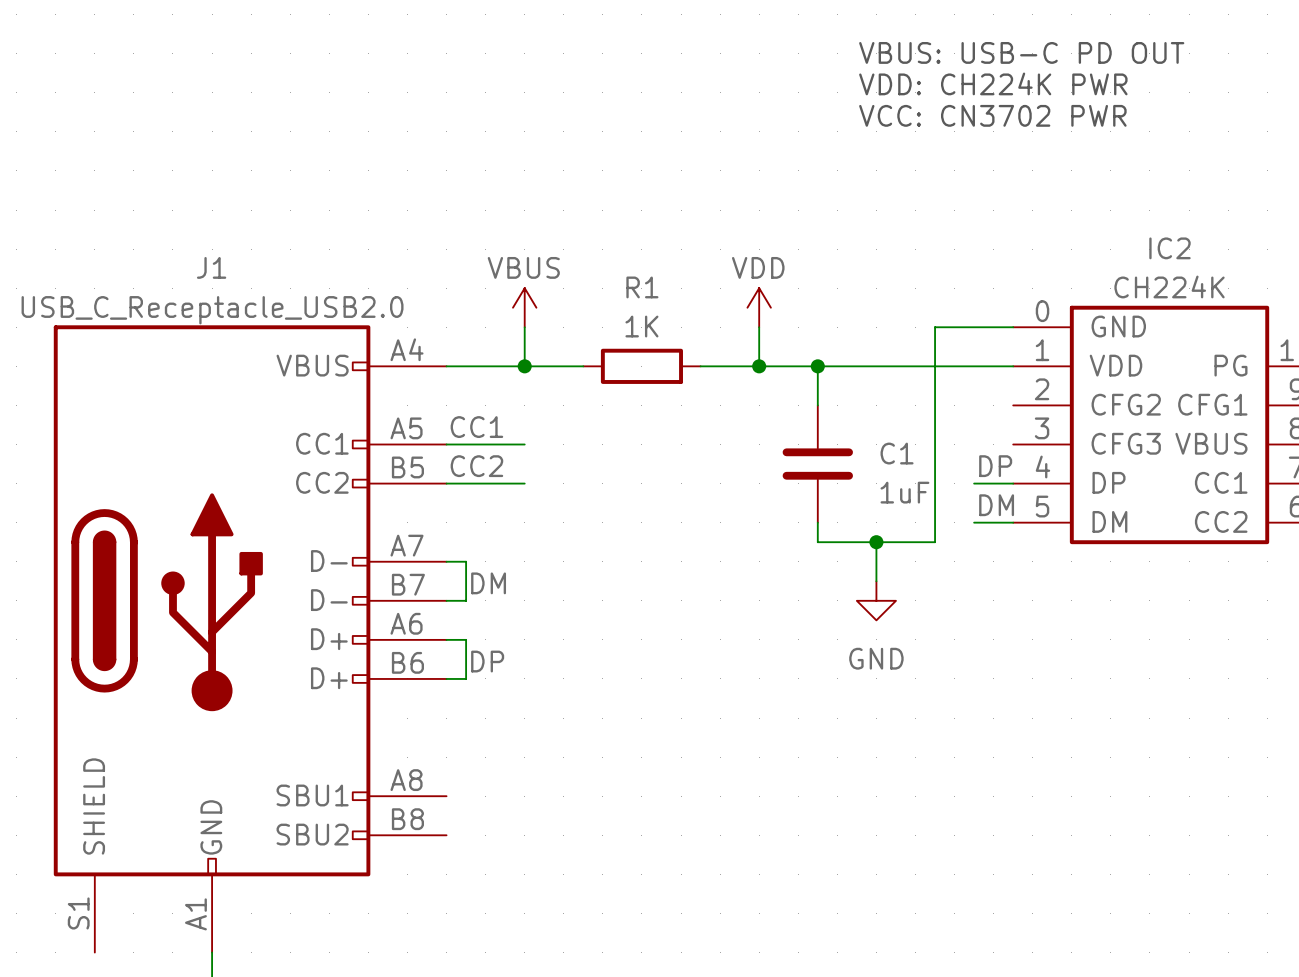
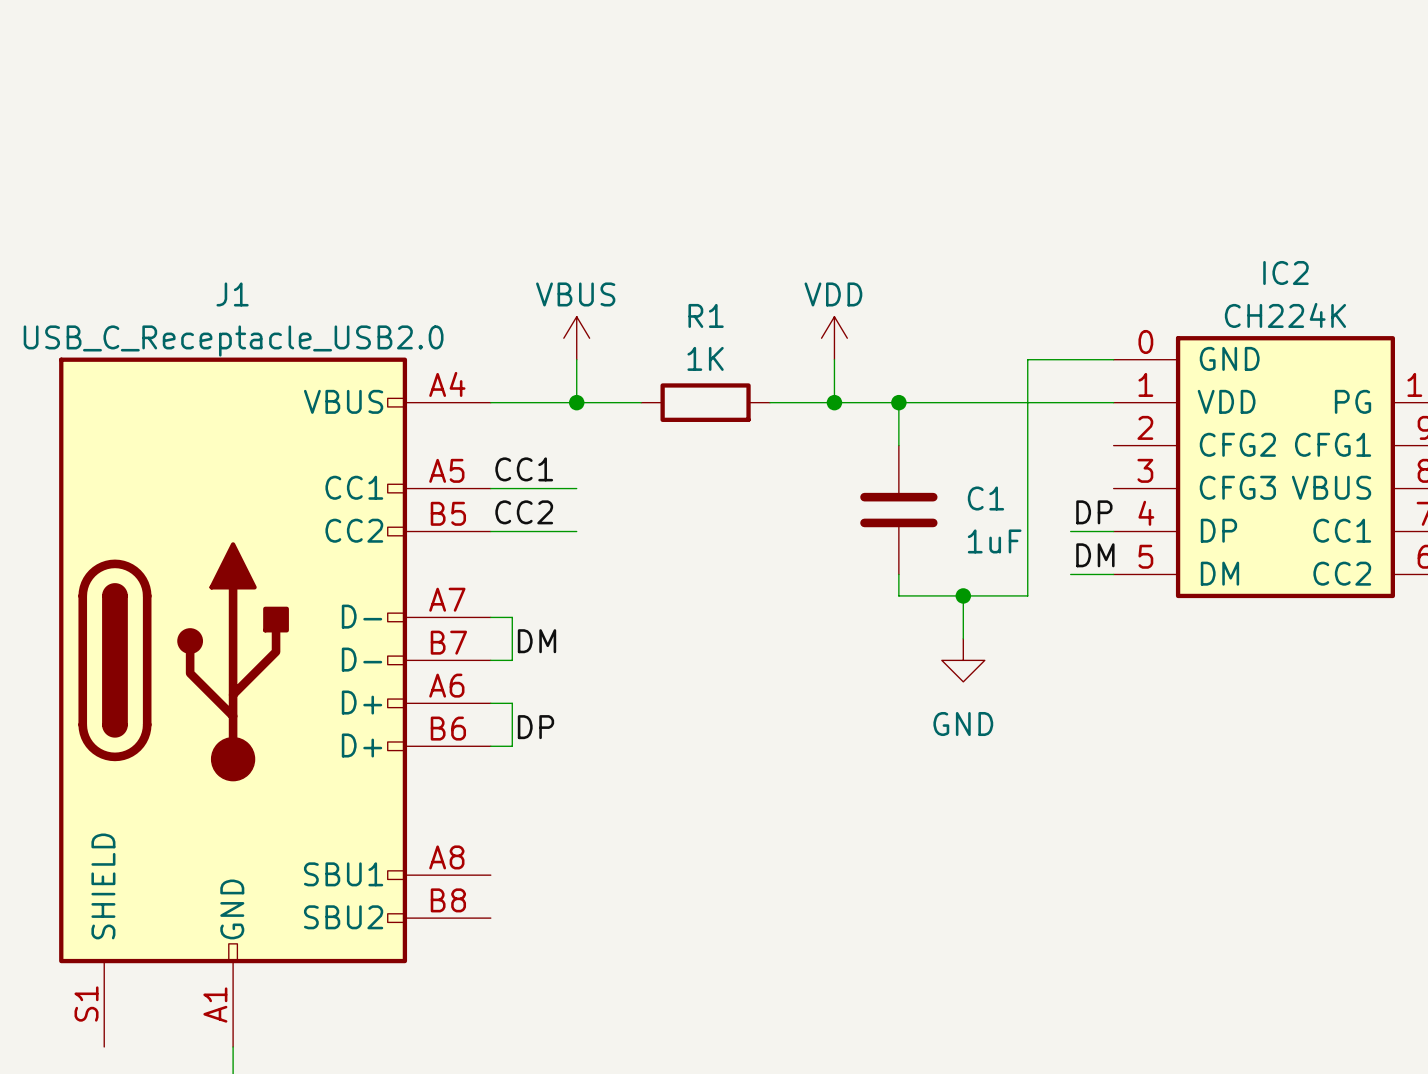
text: VBUS: USB-C PD OUT (1021, 52) -> none
text: VDD: CH224K PWR (993, 83) -> none
text: VCC: CN3702 PWR (992, 115) -> none

